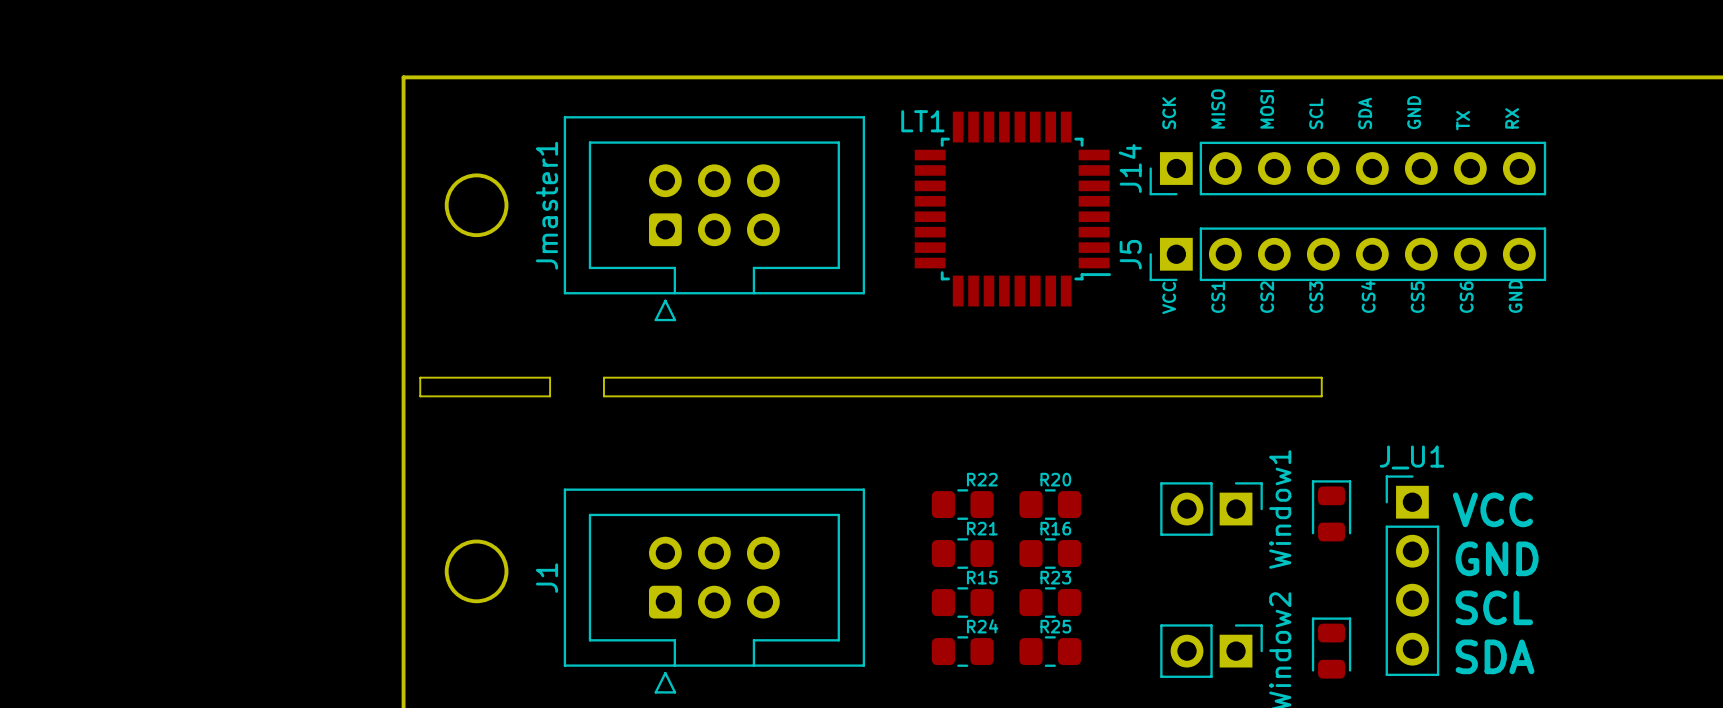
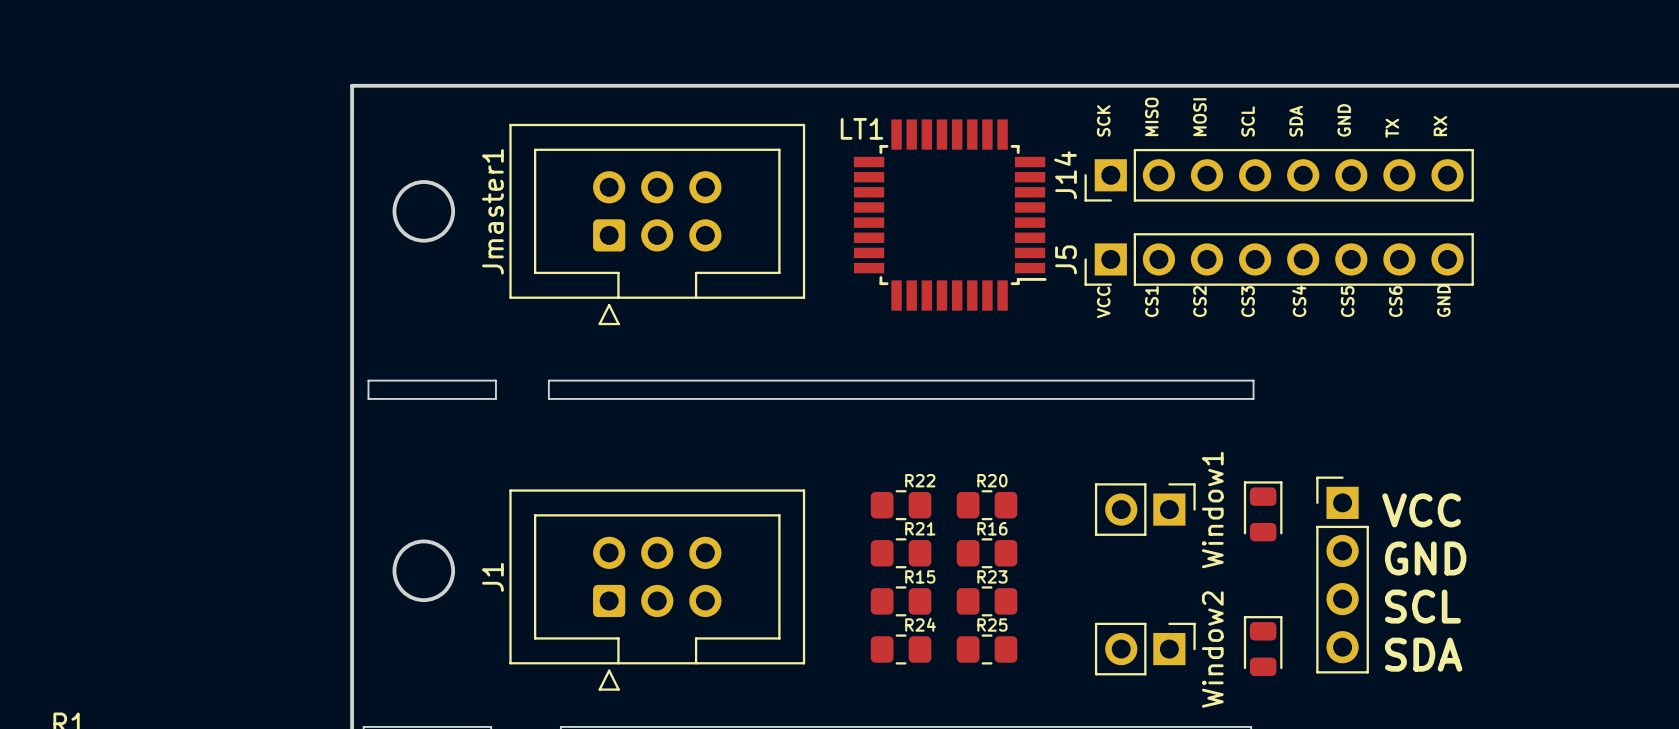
J_U1 name: J_U1 (1411, 457) -> none

